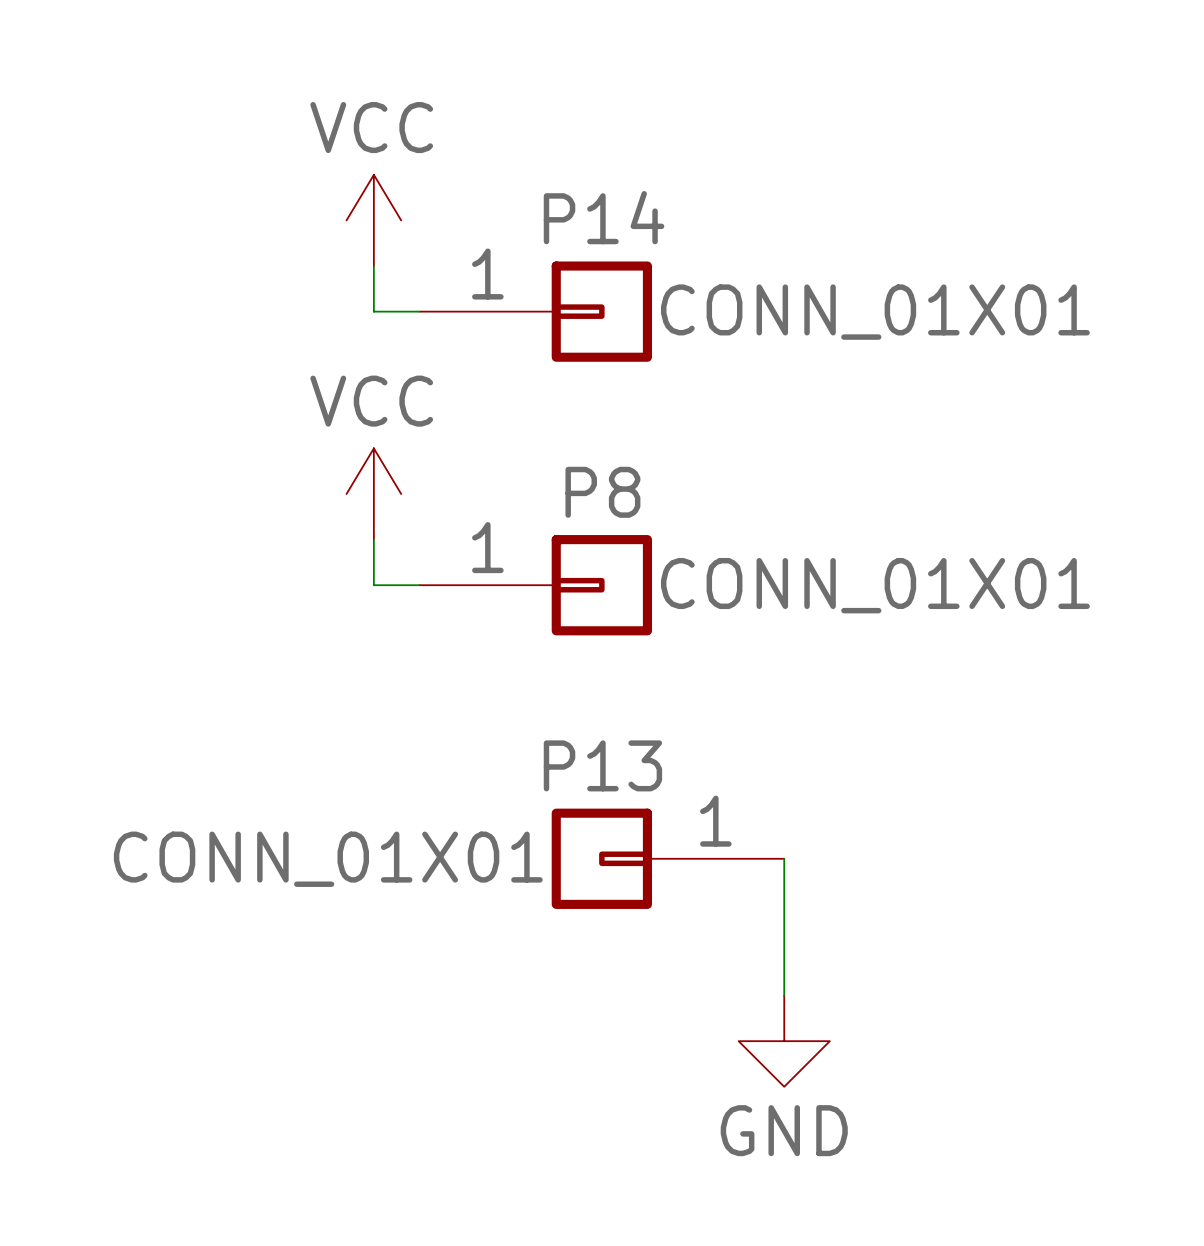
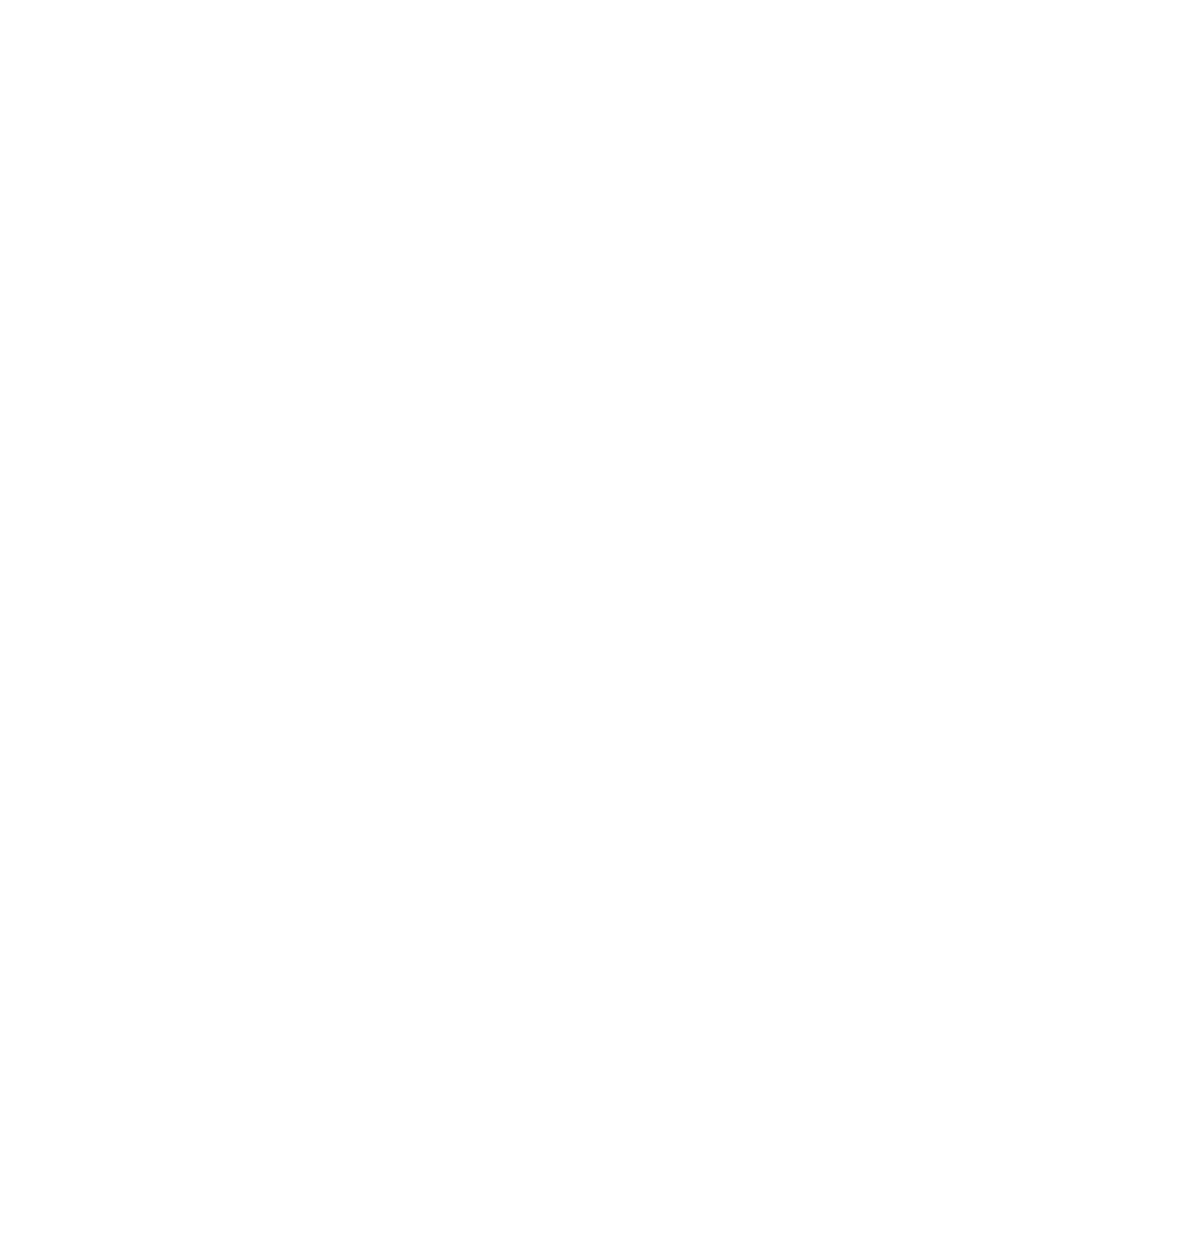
power symbol: VCC (373, 220) -> none
wire: (373, 266) (373, 311) (419, 311) -> none
P14: CONN_01X01 (535, 311) -> none
power symbol: VCC (373, 494) -> none
wire: (373, 539) (373, 585) (419, 585) -> none
P8: CONN_01X01 (535, 585) -> none
P13: CONN_01X01 (667, 858) -> none
wire: (784, 858) (784, 995) -> none
power symbol: GND (784, 1041) -> none

